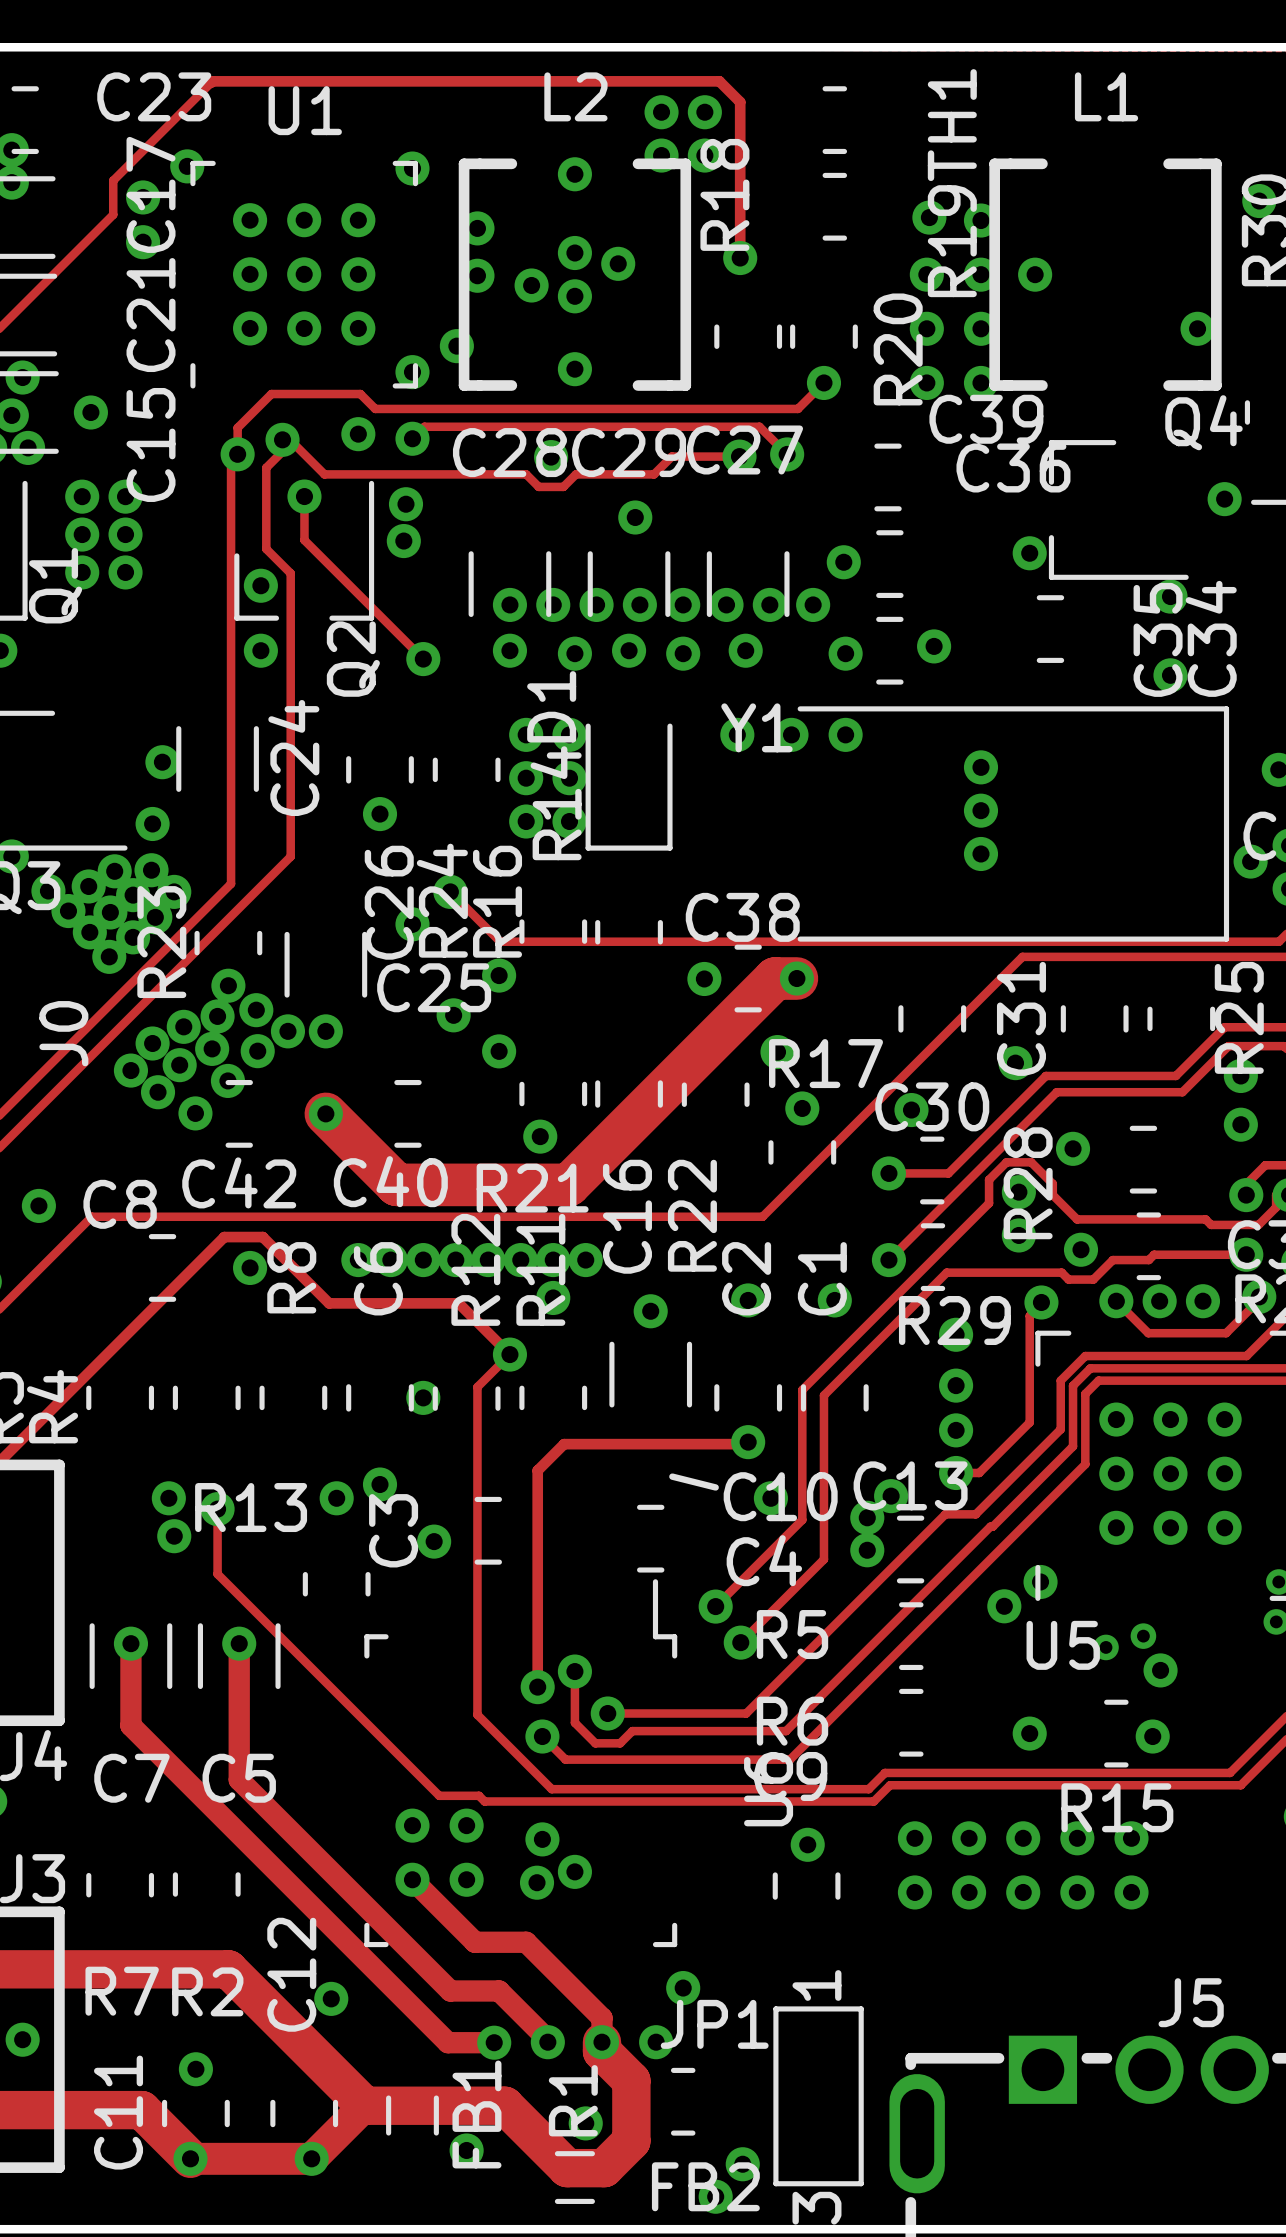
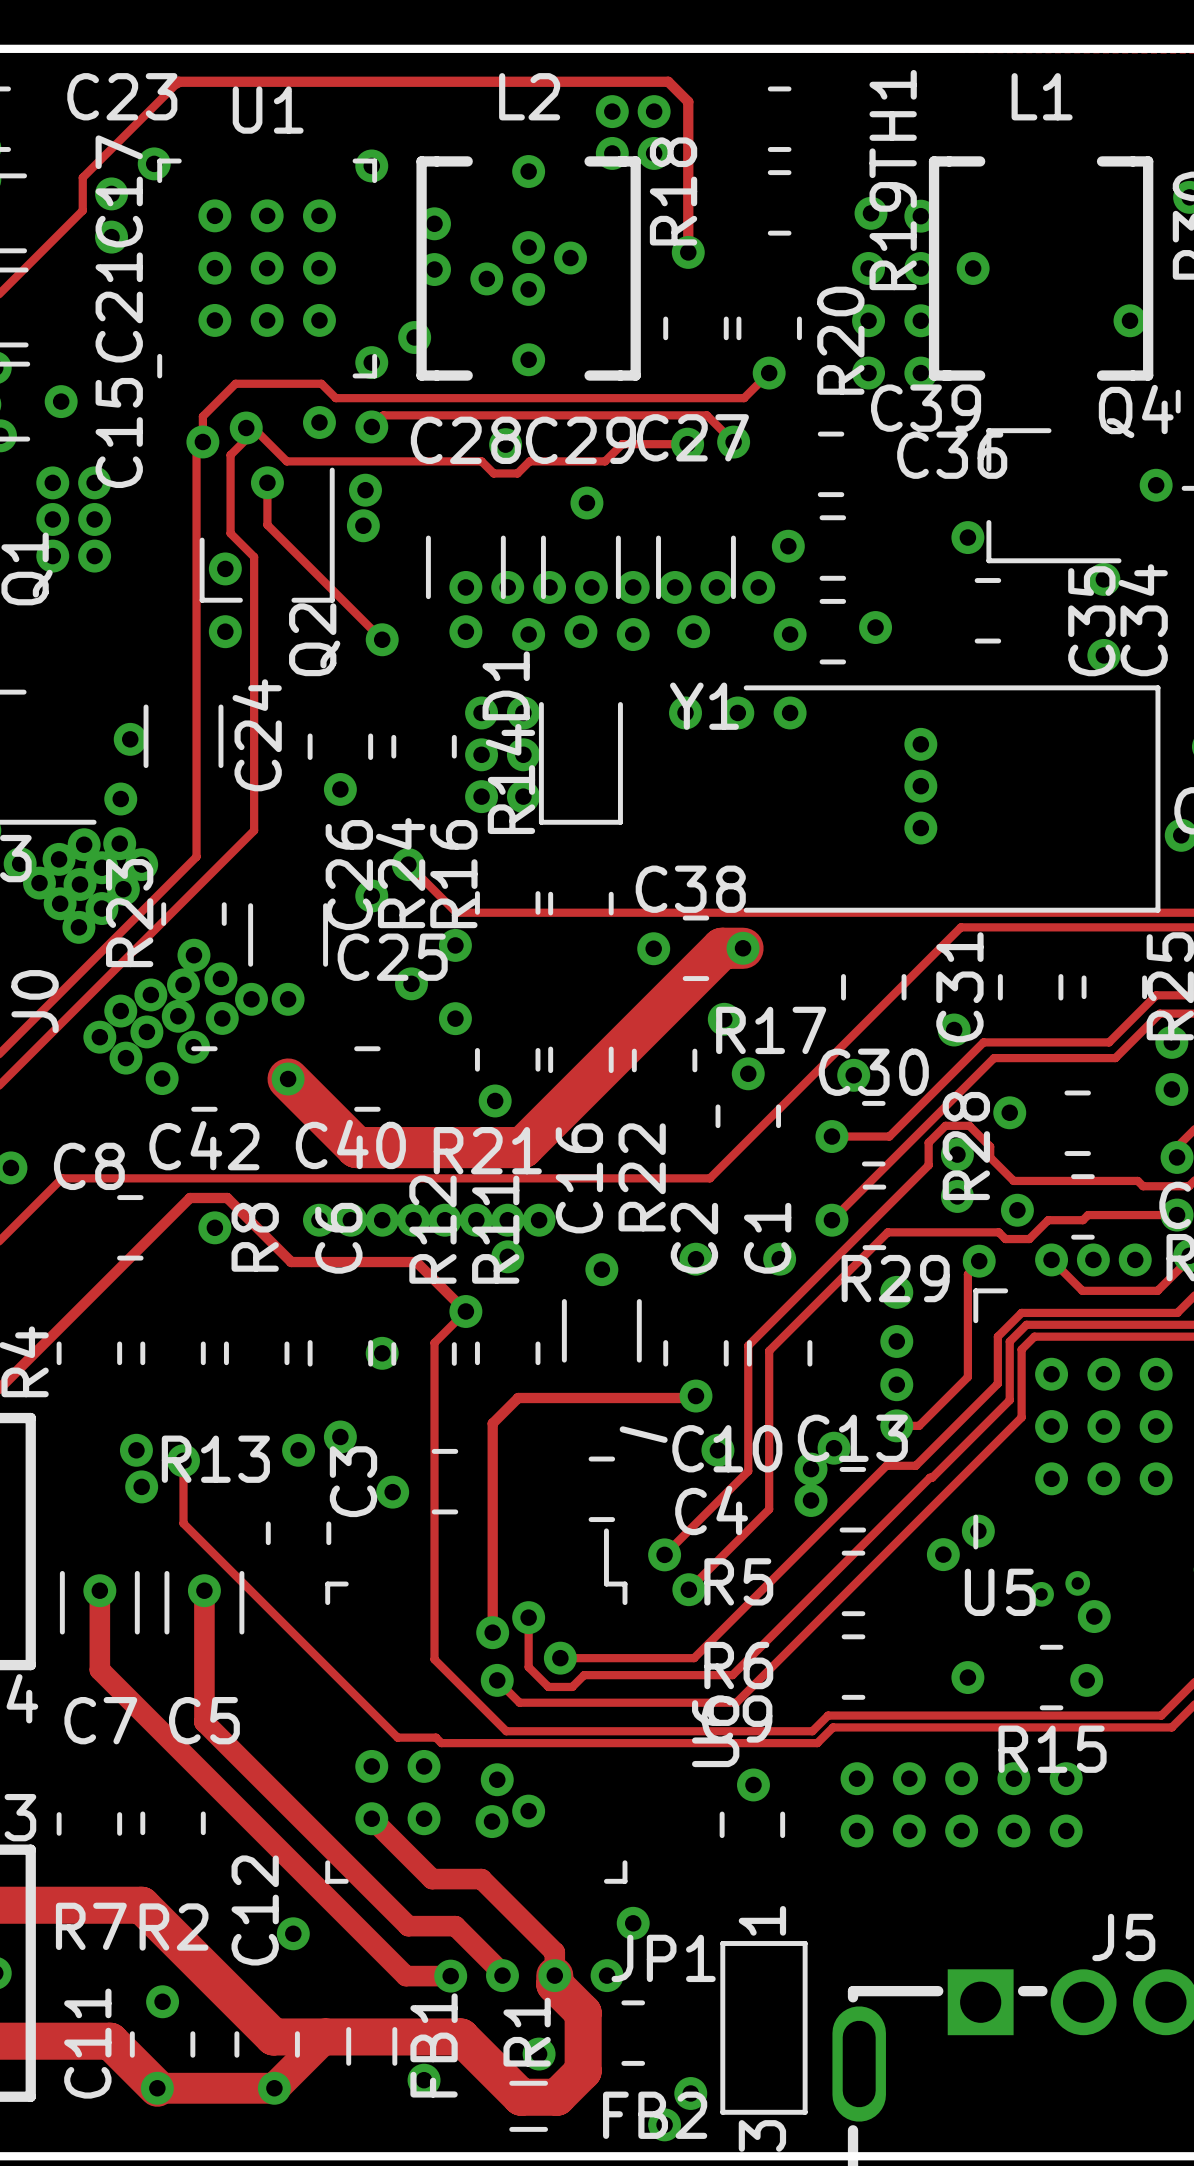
track: (174, 1969) (228, 1969) (364, 2105) -> (141, 1905) (273, 2036) (325, 2036)

